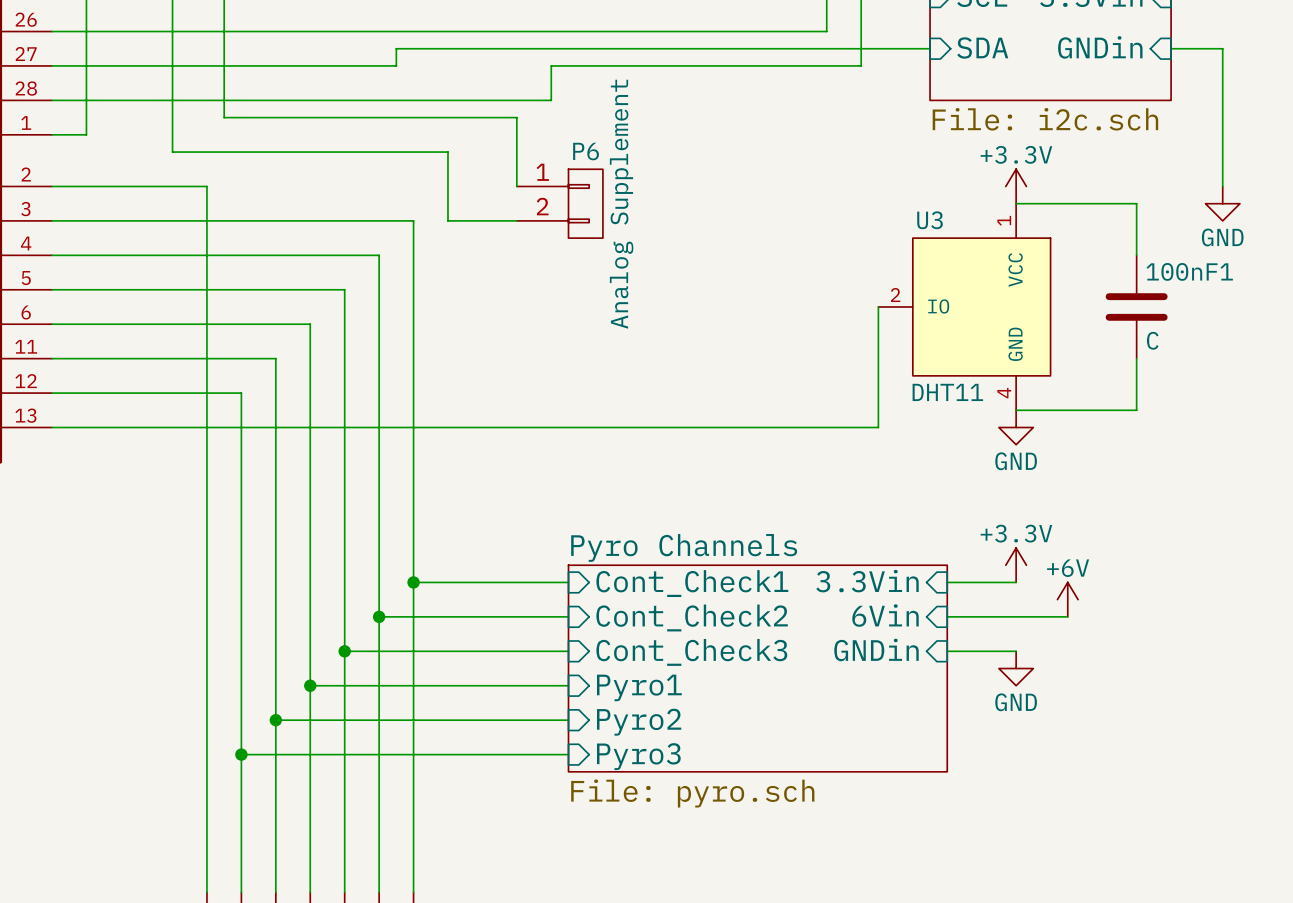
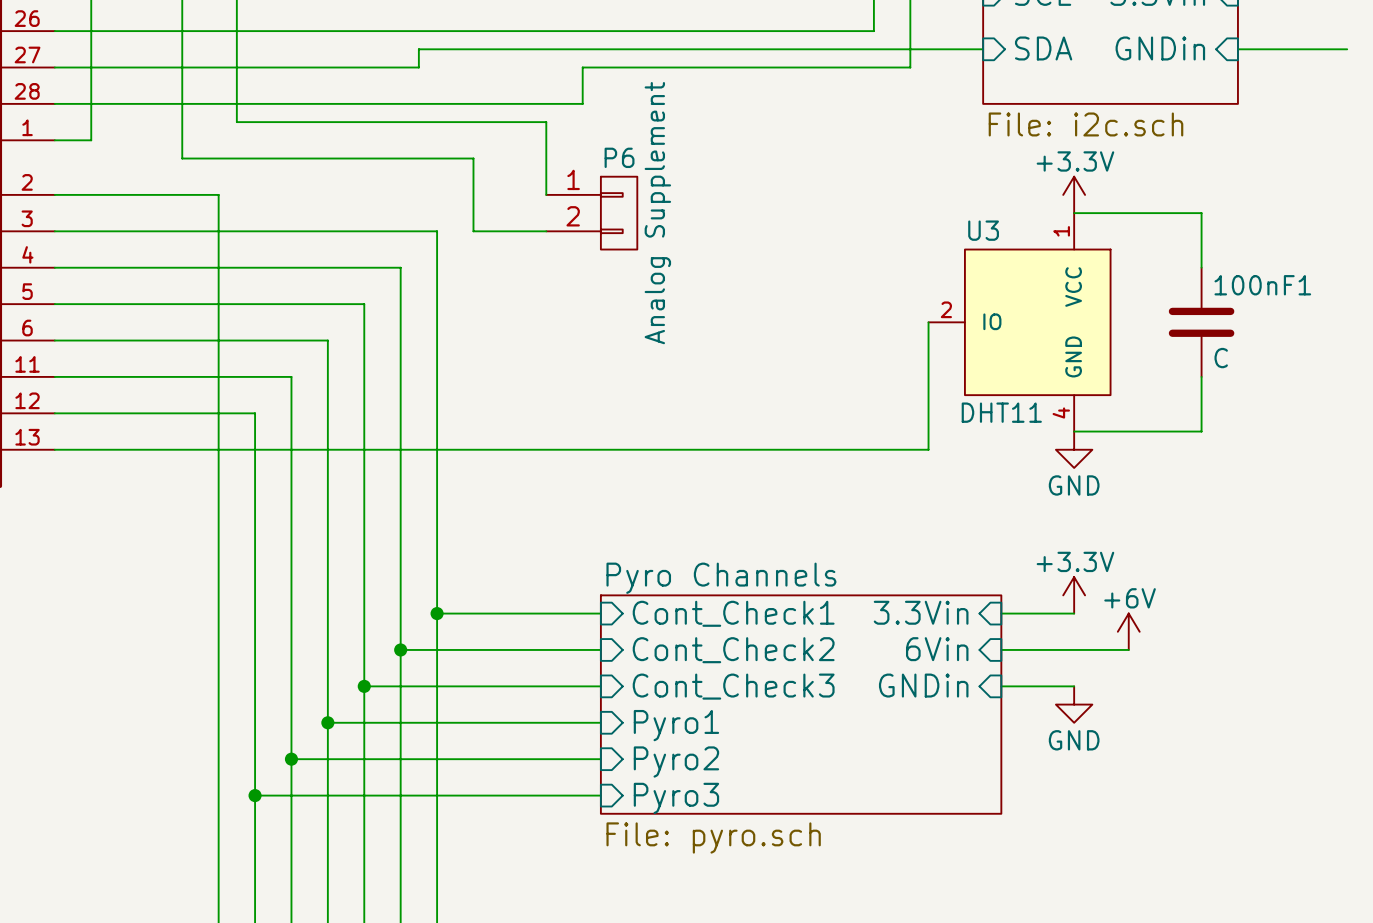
wire: (1222, 48) (1222, 186) -> (1292, 49) (1347, 49)
power symbol: GND (1222, 203) -> none

